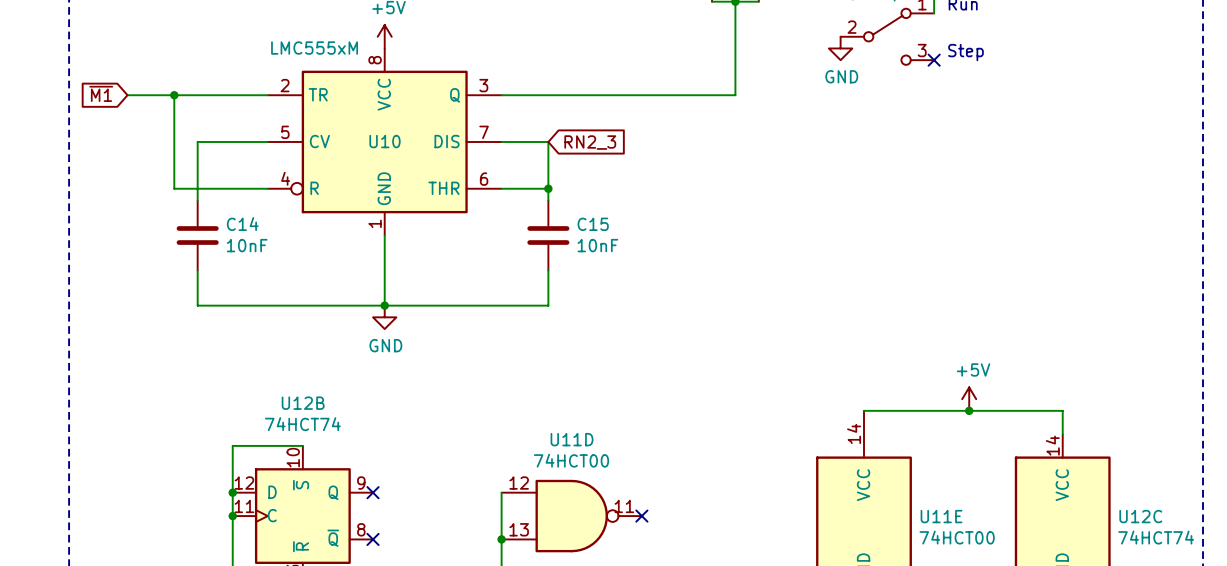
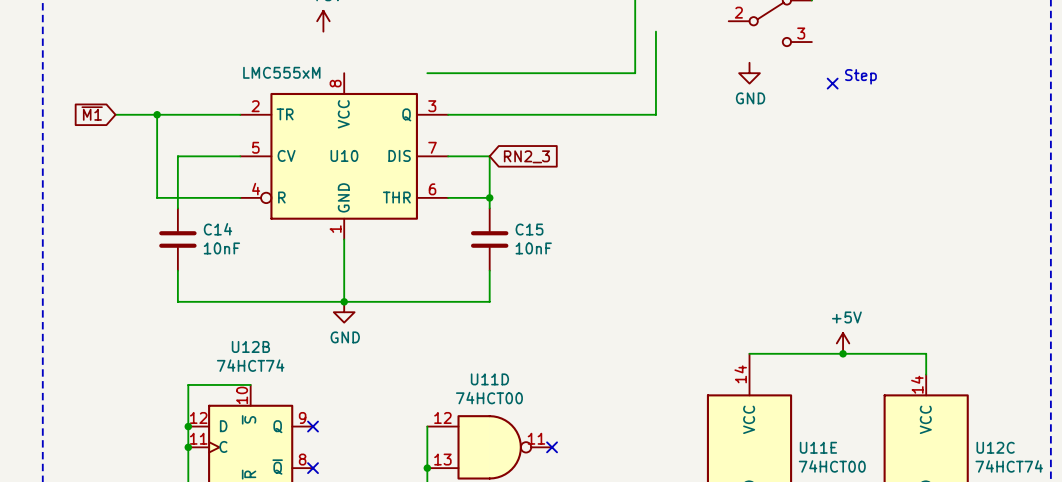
power symbol position: GND (840, 48) -> GND (749, 73)
text position: Step (965, 52) -> Step (860, 76)
no-connect mark position: (934, 60) -> (832, 83)
global label position: ~{M1} (101, 93) -> ~{M1} (92, 113)
wire: (127, 95) (267, 95) -> none
wire: (174, 95) (174, 188) (221, 188) -> (177, 208) (177, 156)
junction position: (174, 95) -> (157, 114)
wire: none -> (115, 114) (157, 114)
U10 position: (384, 141) -> (344, 156)
wire: (548, 141) (548, 200) -> (468, 114) (655, 114) (655, 31)
global label position: RN2_3 (590, 142) -> RN2_3 (526, 156)
wire: none -> (468, 156) (489, 156) (489, 208)
junction position: (548, 188) -> (489, 197)
wire: none -> (157, 166) (157, 197) (240, 197)
C14 position: (197, 235) -> (177, 239)
wire: (384, 235) (384, 305) -> (344, 239) (344, 301)
wire: none -> (448, 197) (489, 197)
C15 position: (548, 235) -> (489, 239)
wire: (197, 270) (197, 305) (548, 305) (548, 270) -> (177, 270) (177, 301) (489, 301) (489, 270)
junction position: (384, 305) -> (344, 301)
power symbol position: GND (384, 317) -> GND (344, 312)

